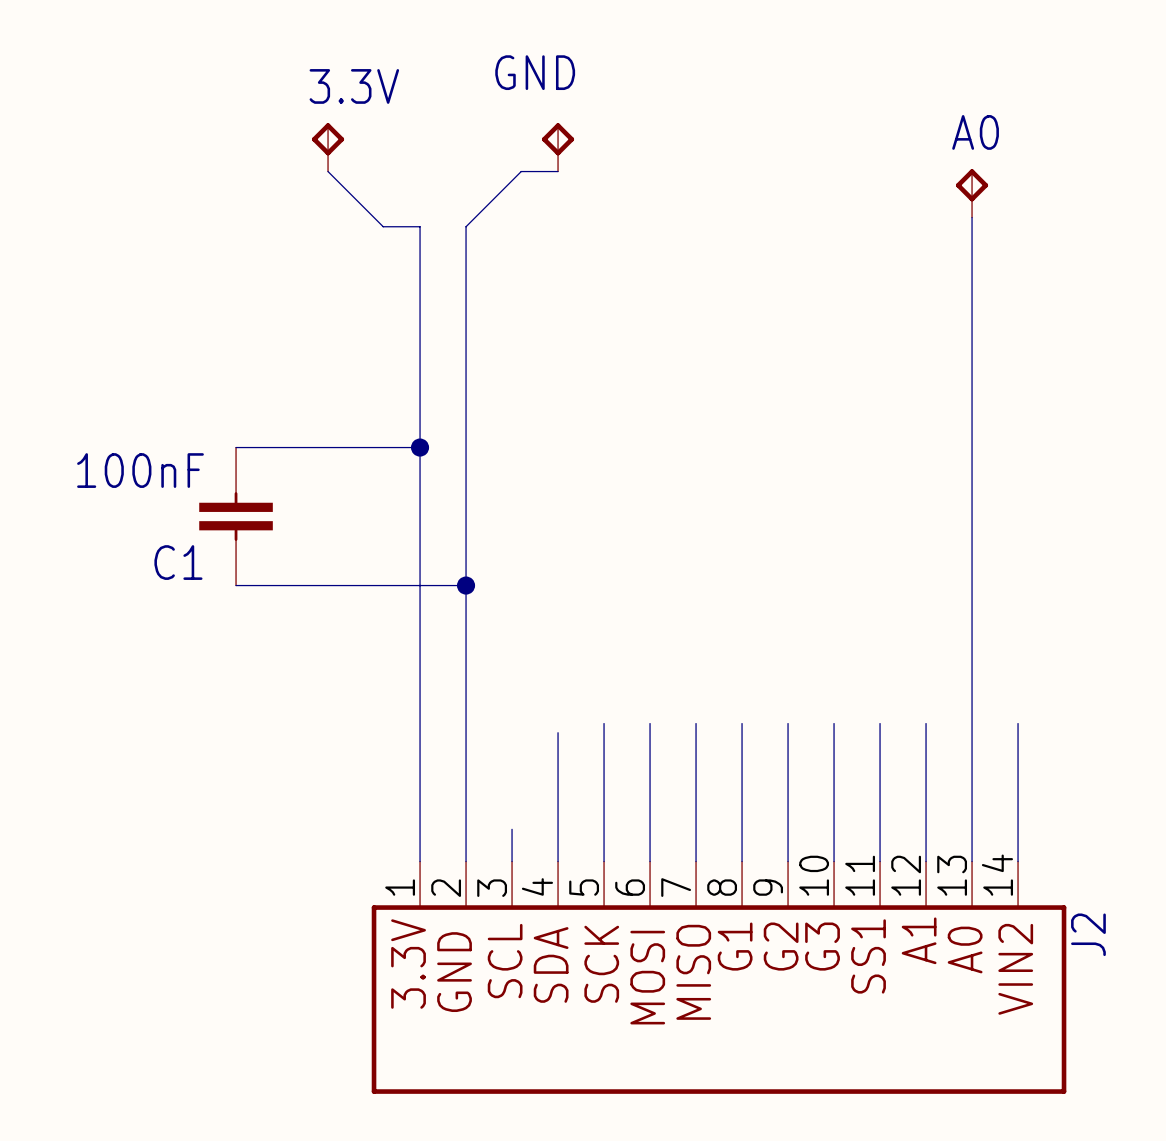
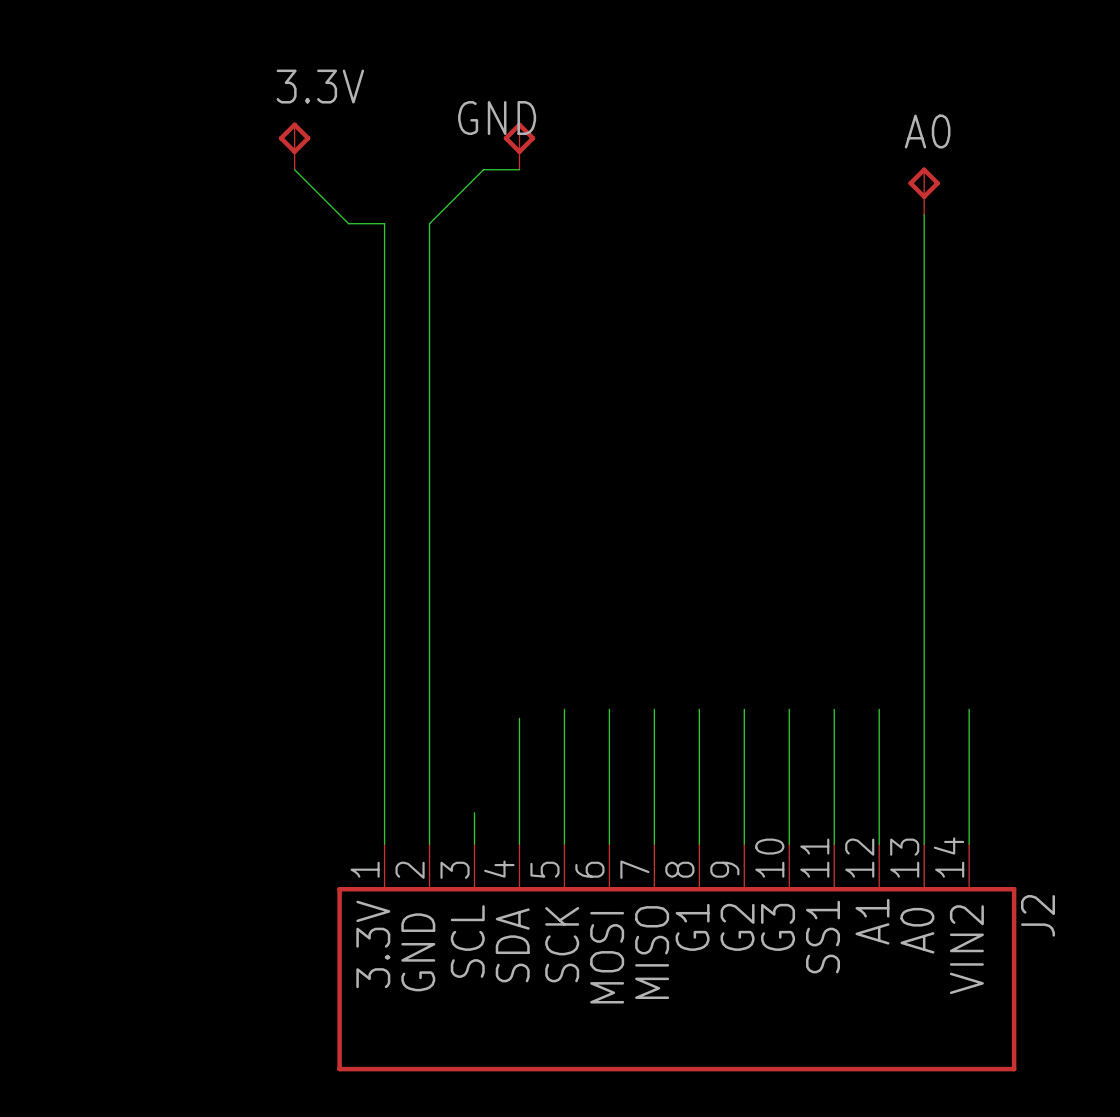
GND name position: GND (535, 72) -> GND (497, 118)
wire: (236, 447) (420, 447) -> none
junction: (420, 447) -> none
C1: 100nF (236, 516) -> none
wire: (236, 585) (466, 585) -> none
junction: (466, 585) -> none

